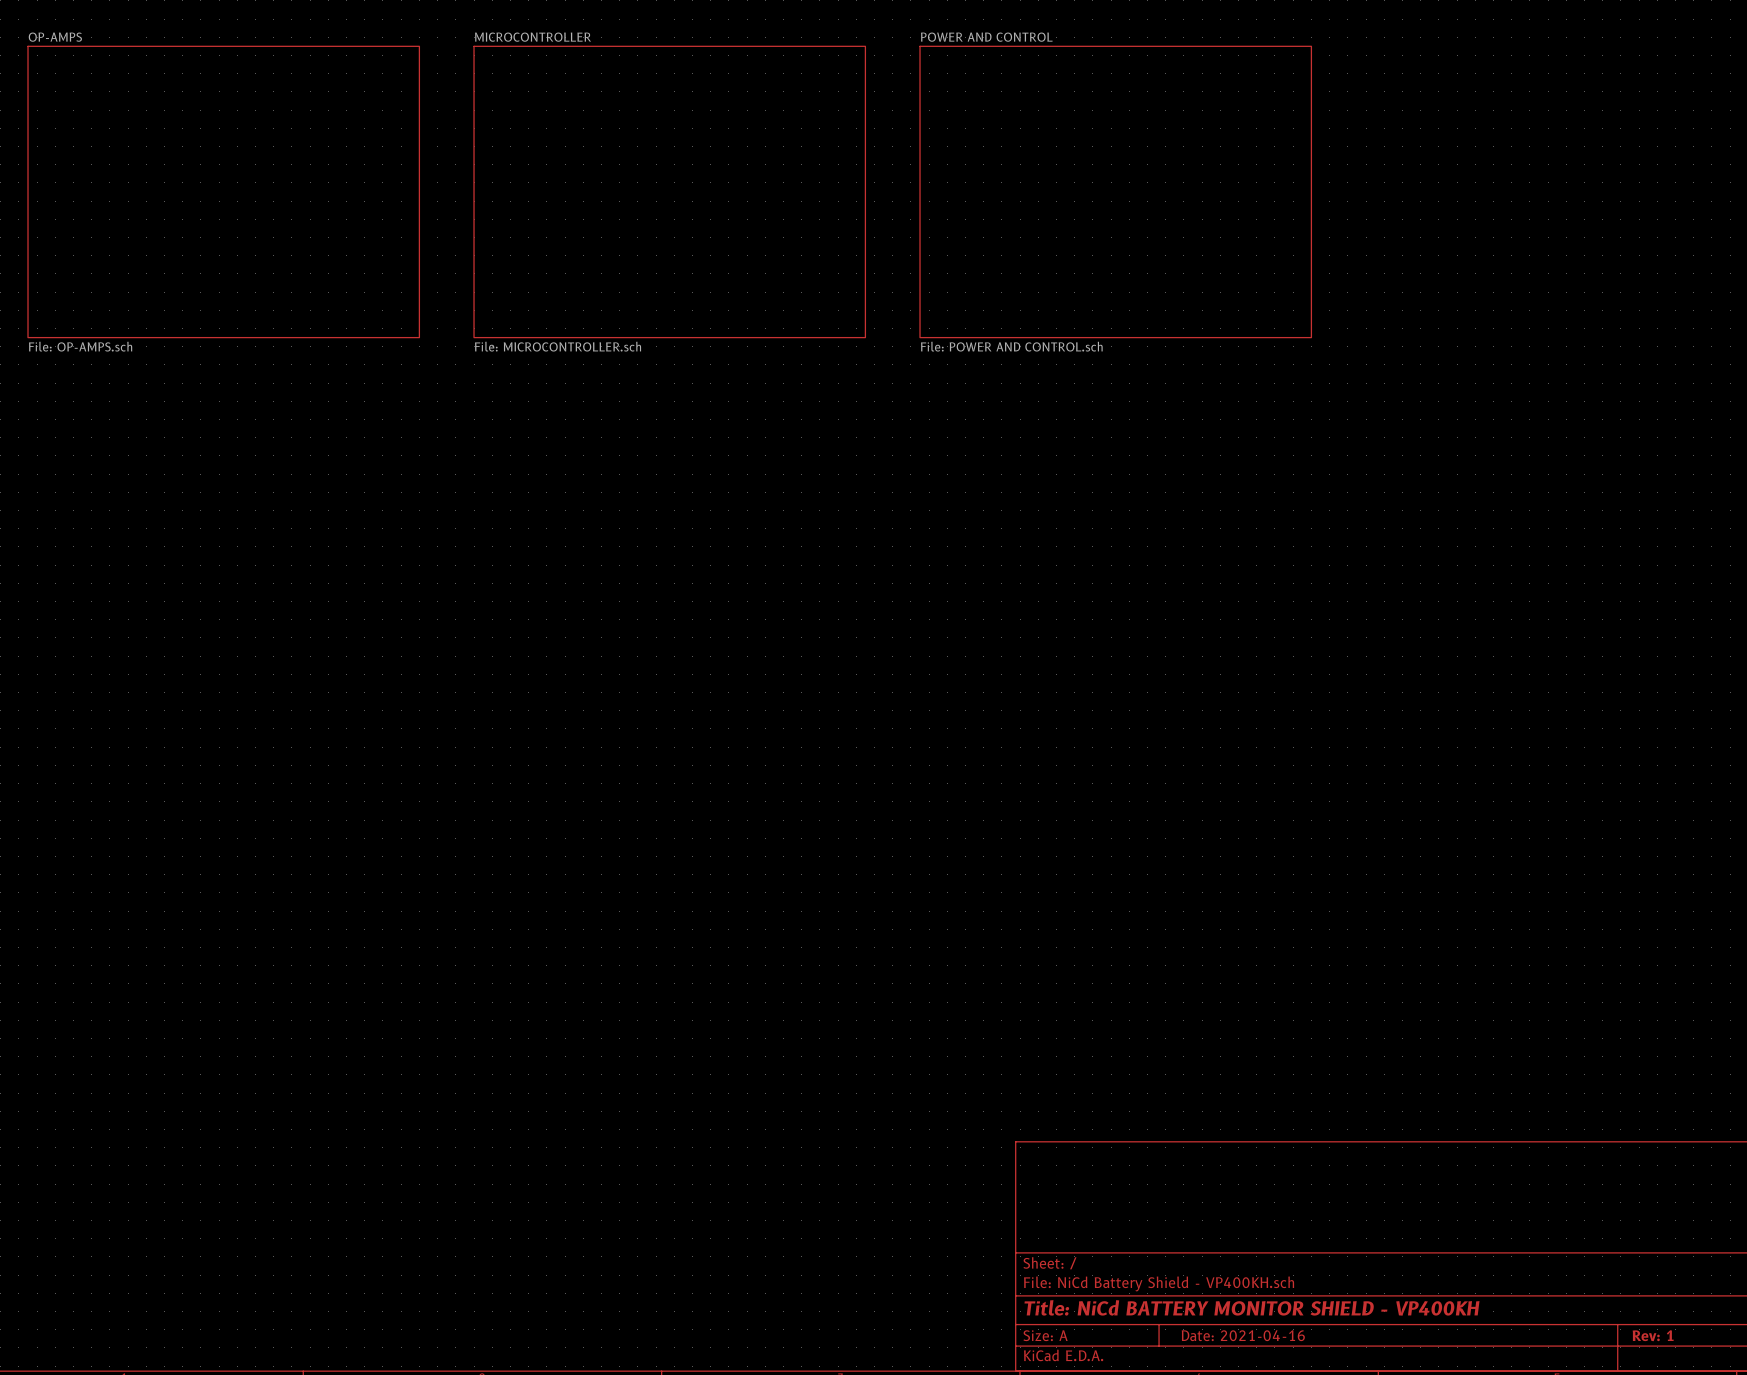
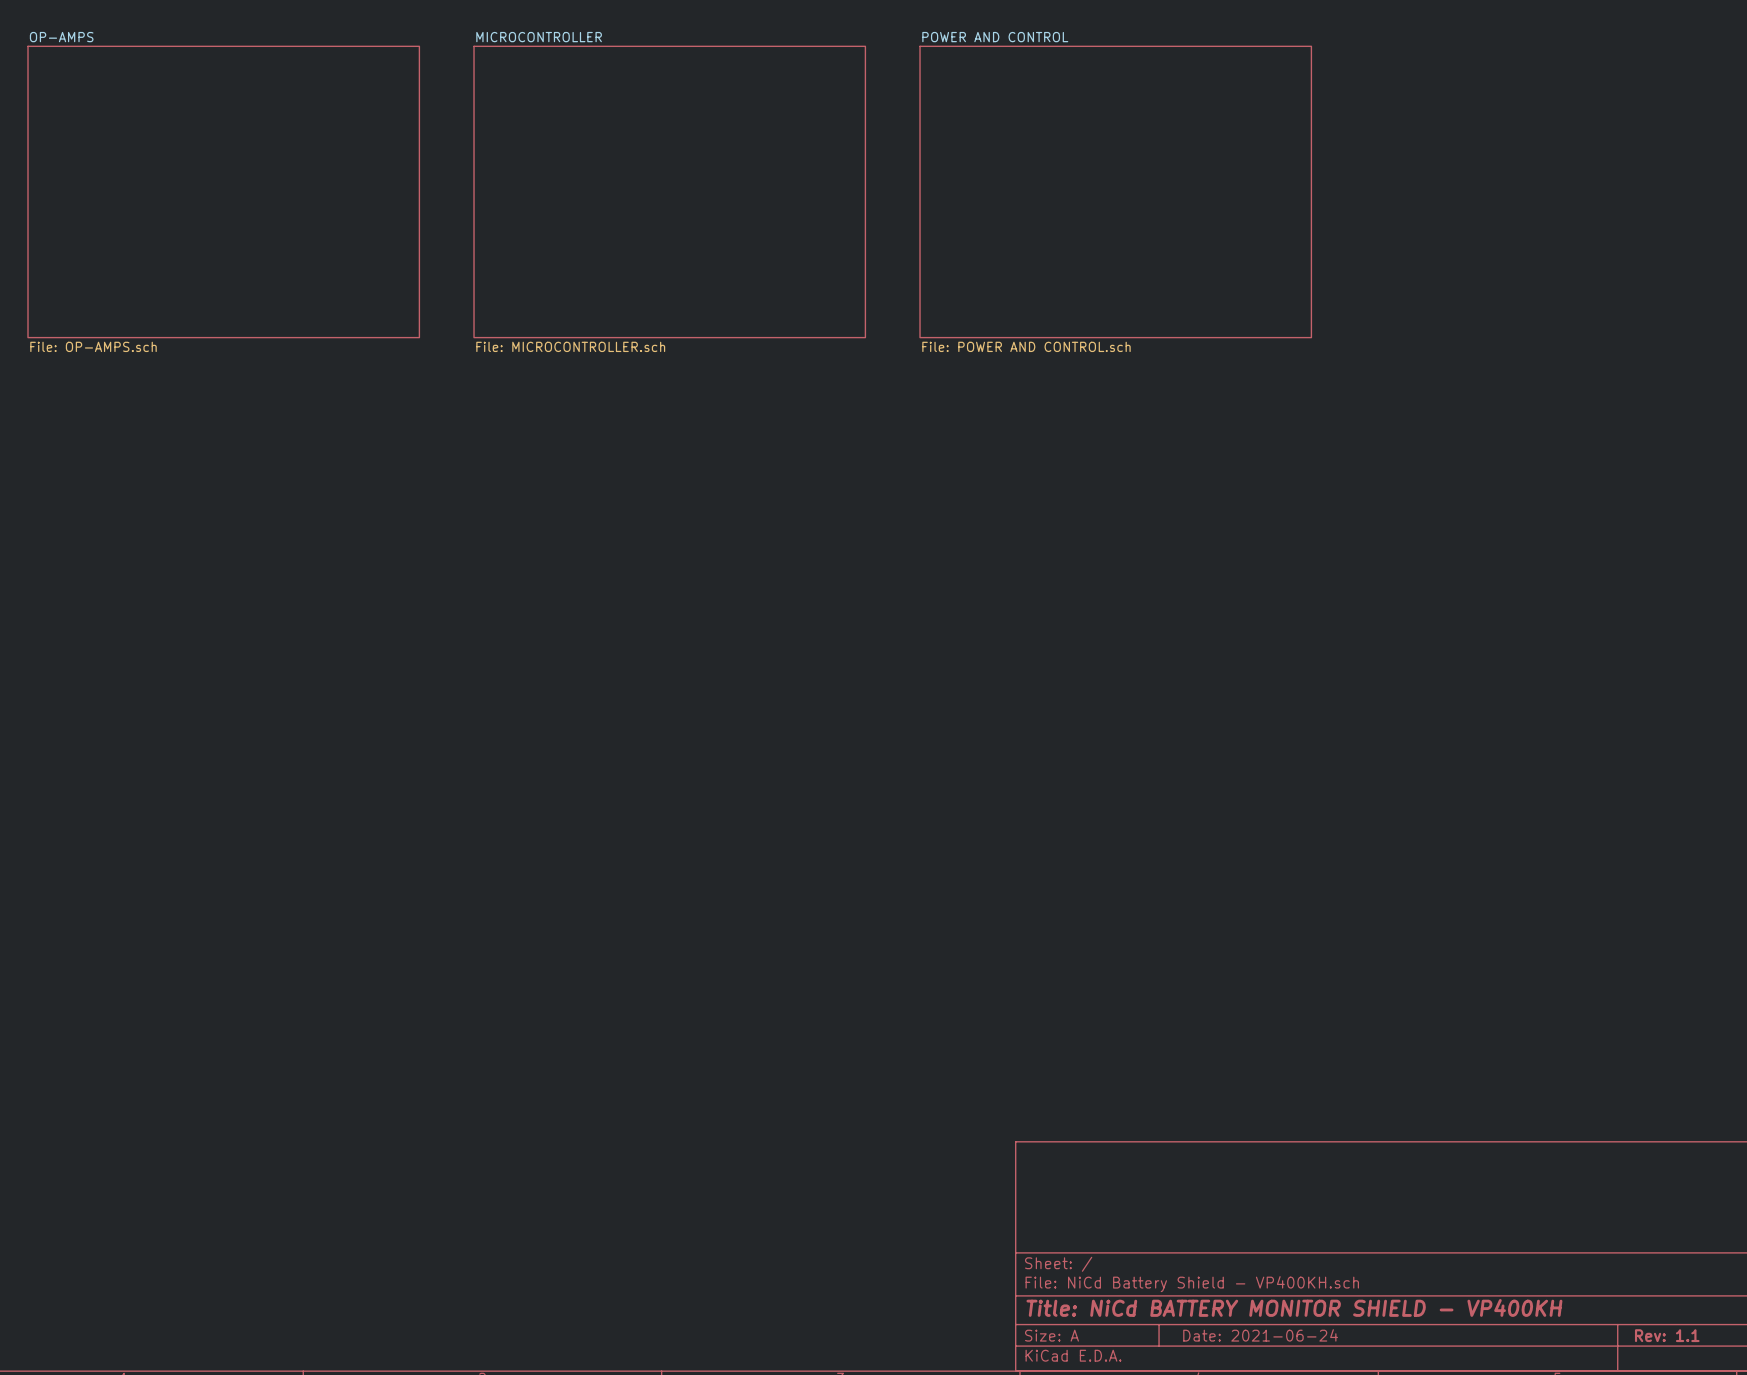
title block: Date: 2021-04-16 (1243, 1335) -> Date: 2021-06-24 (1260, 1335)
title block: Rev: 1 (1653, 1335) -> Rev: 1.1 (1667, 1335)

